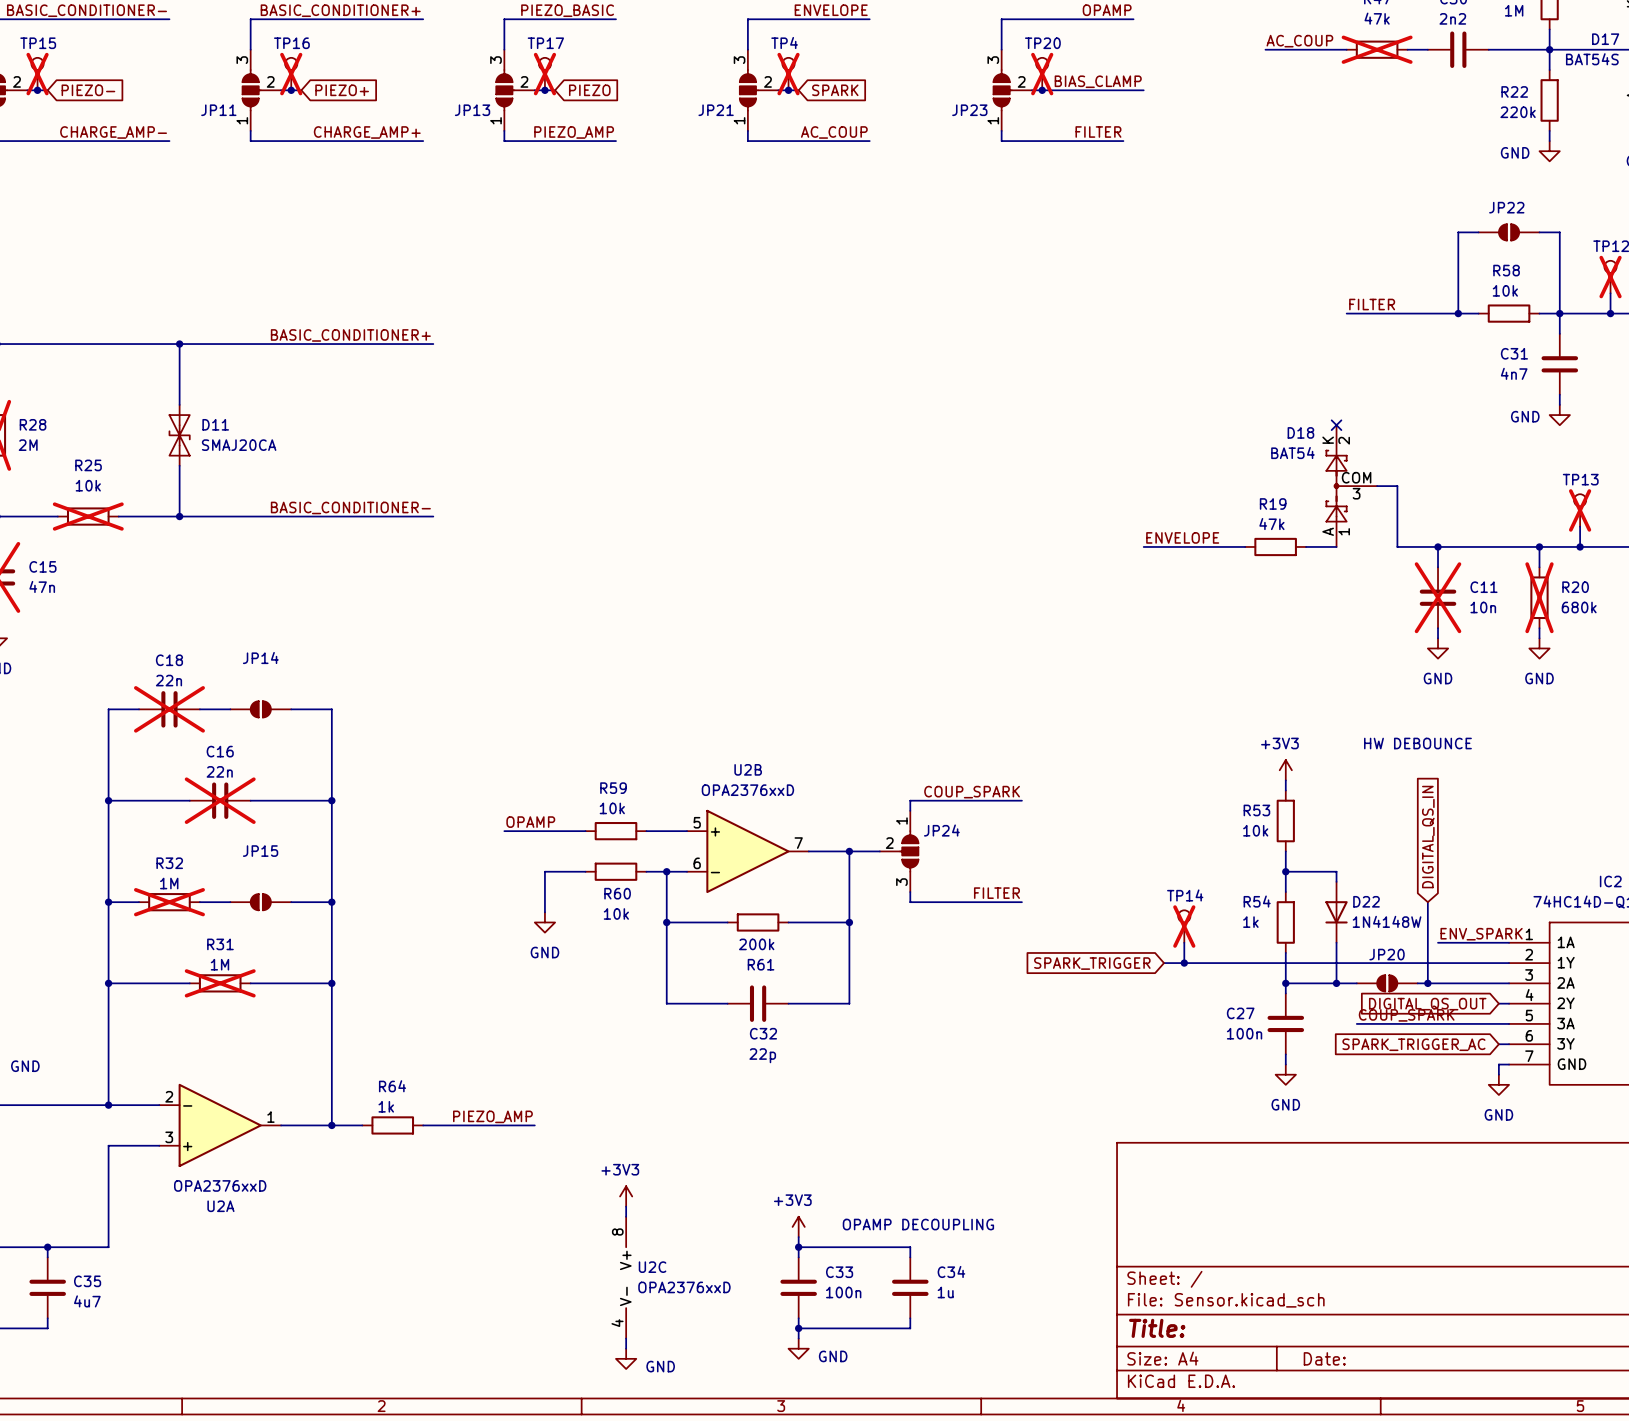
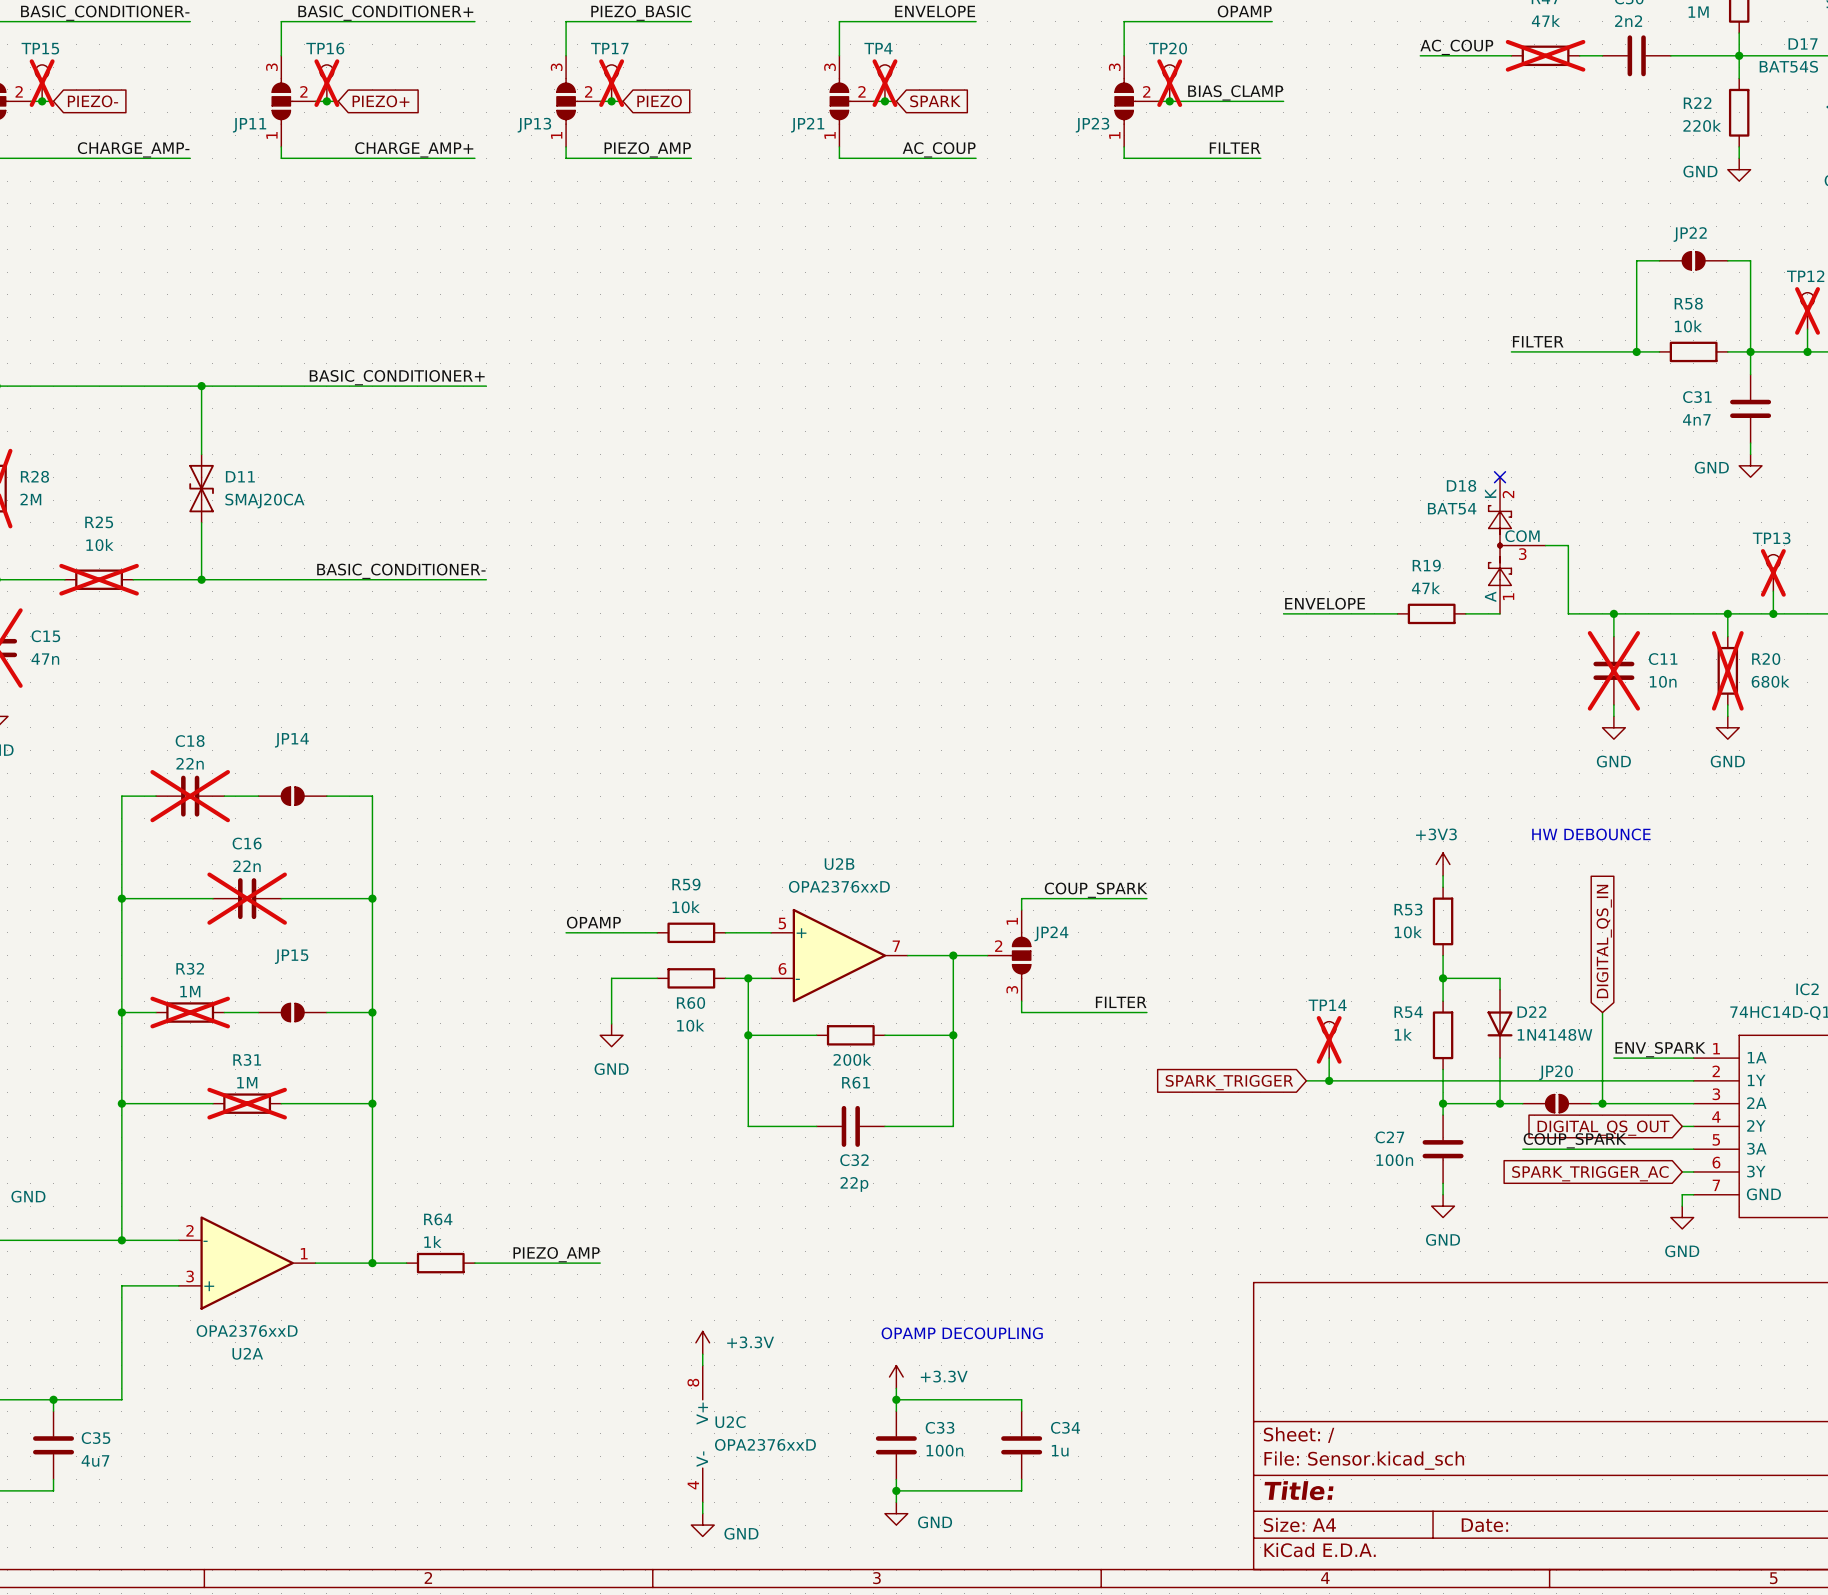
power symbol: +3V3 (626, 1196) -> +3.3V (702, 1342)
text position: OPAMP DECOUPLING (918, 1224) -> OPAMP DECOUPLING (962, 1333)
power symbol: +3V3 (798, 1226) -> +3.3V (896, 1377)

